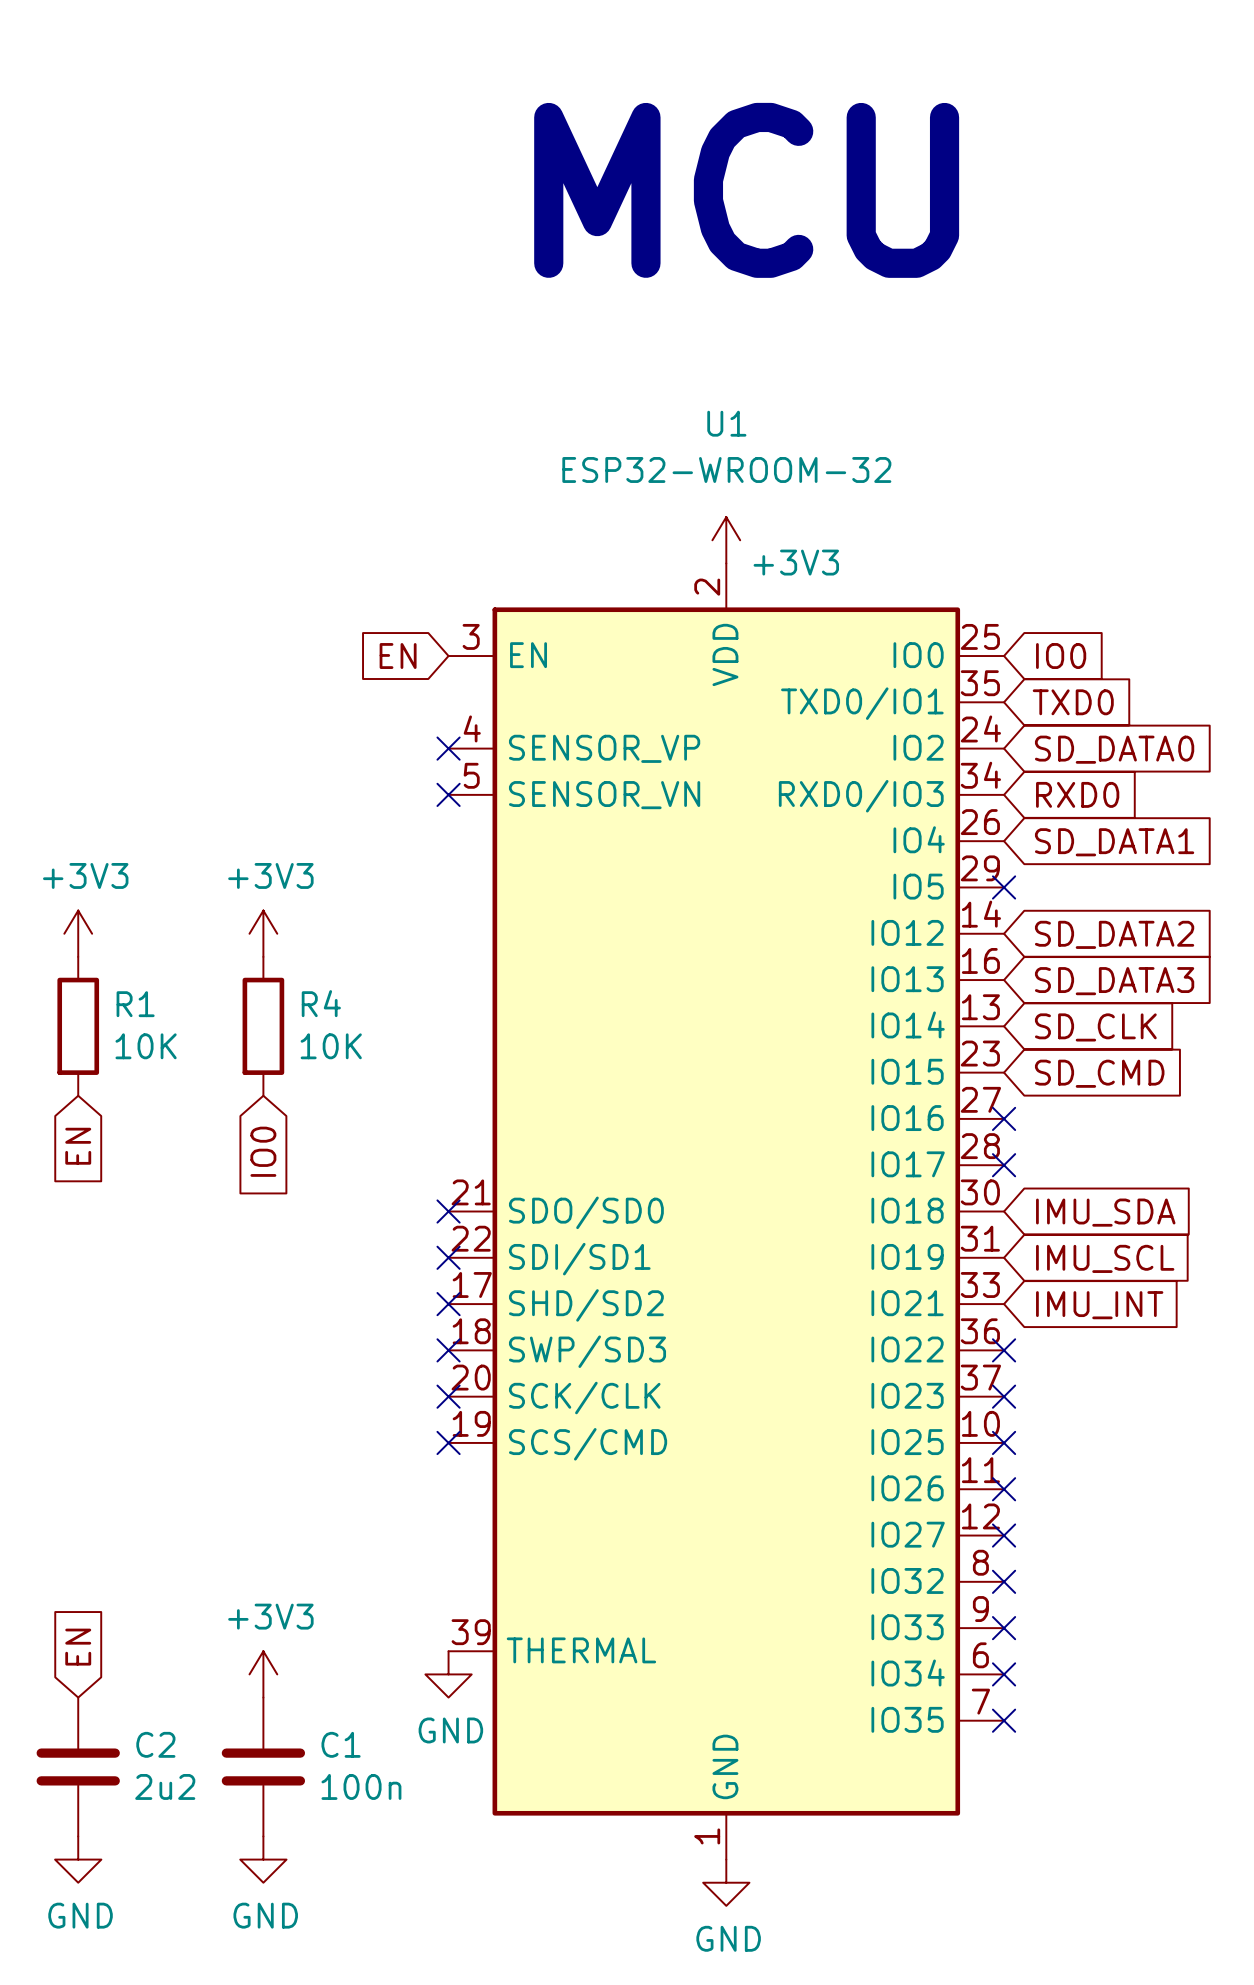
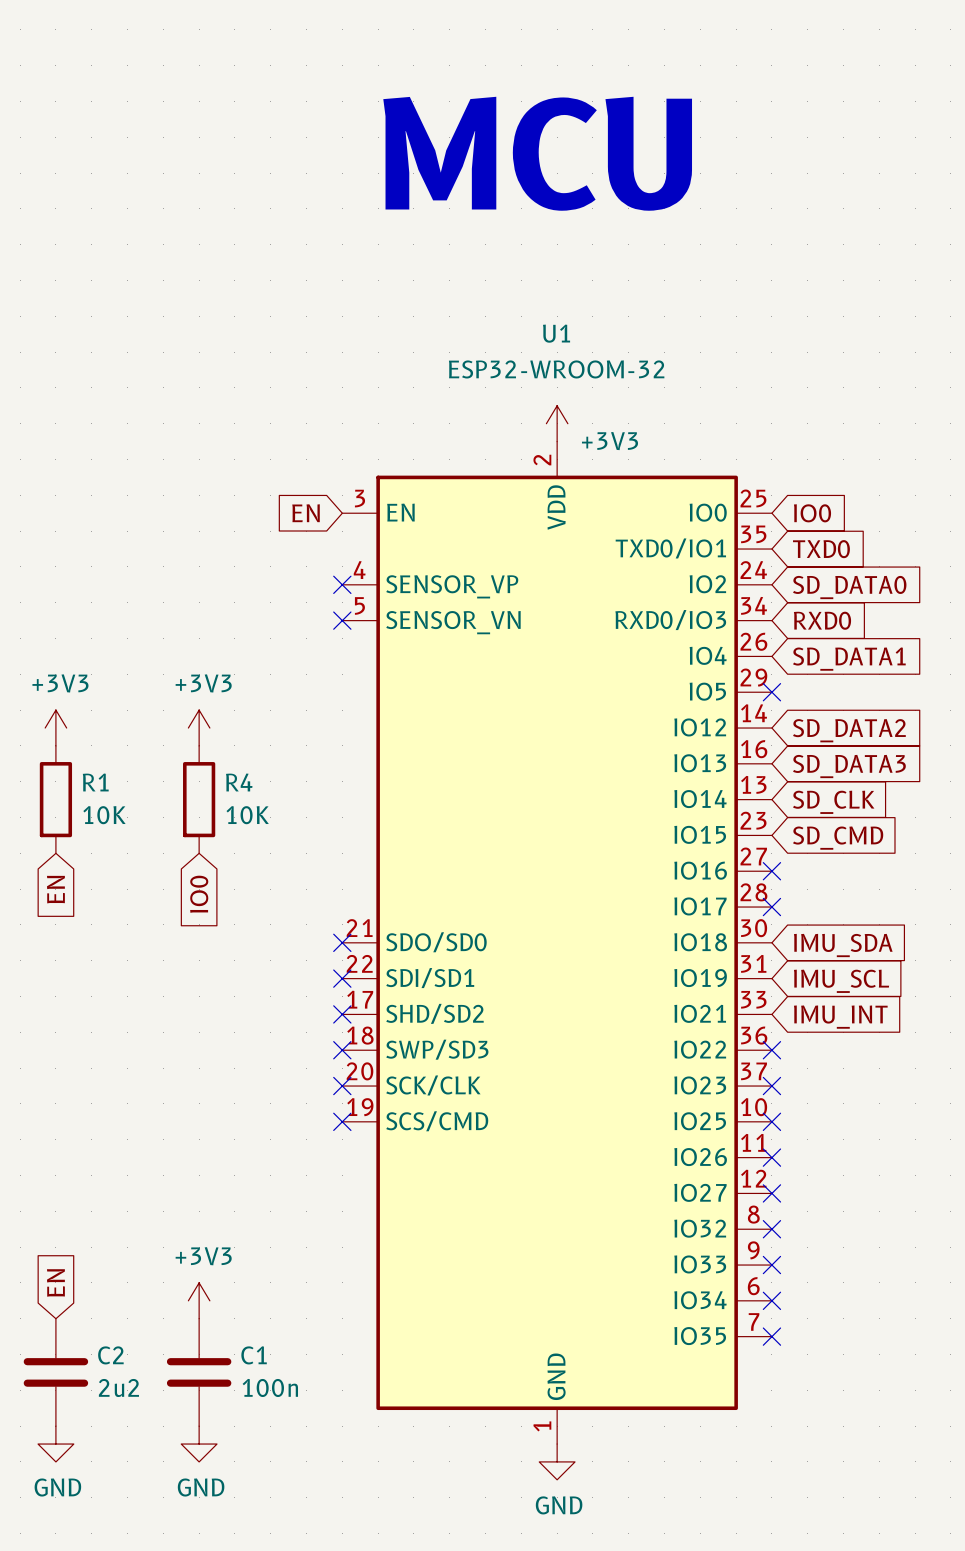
U1 symbol: [448, 563, 1005, 1860] -> [342, 441, 772, 1445]
power symbol: GND (448, 1674) -> none

